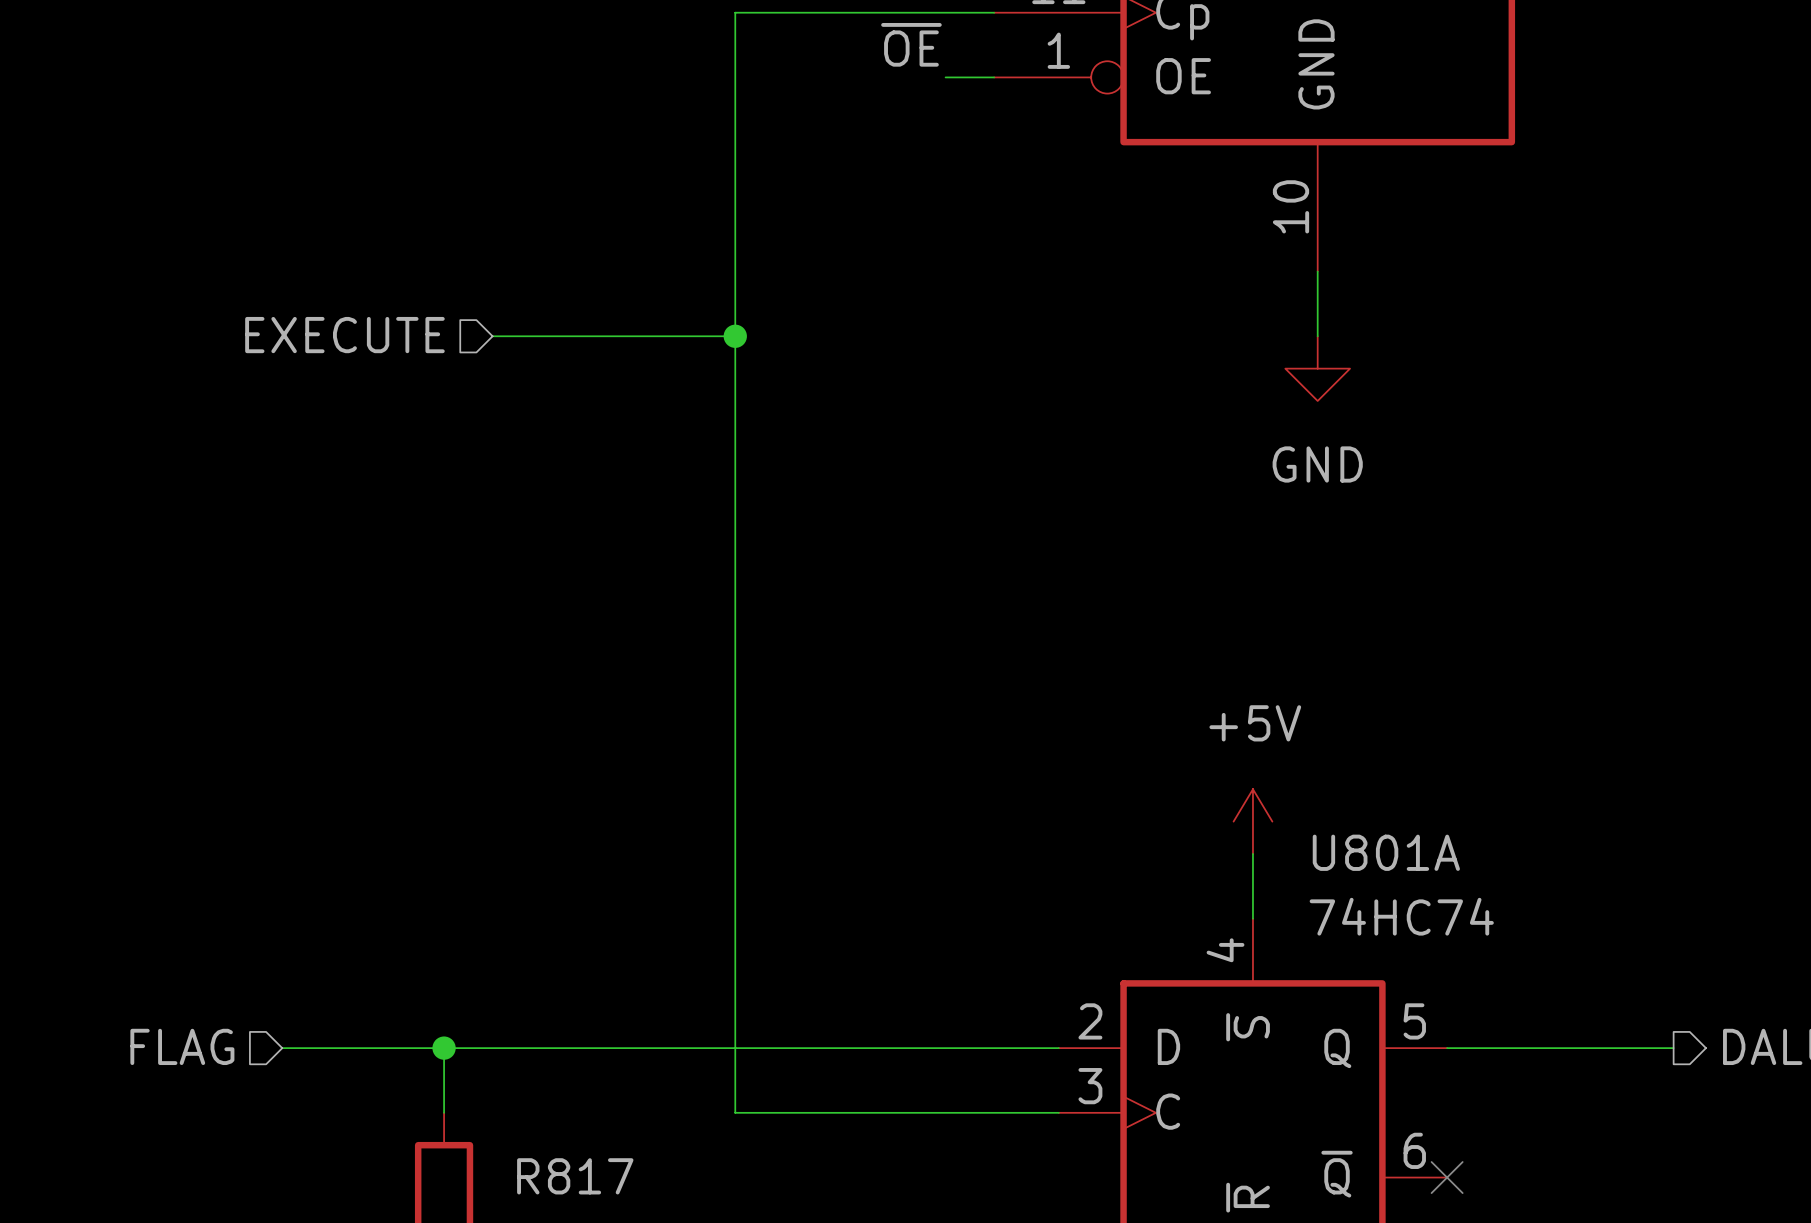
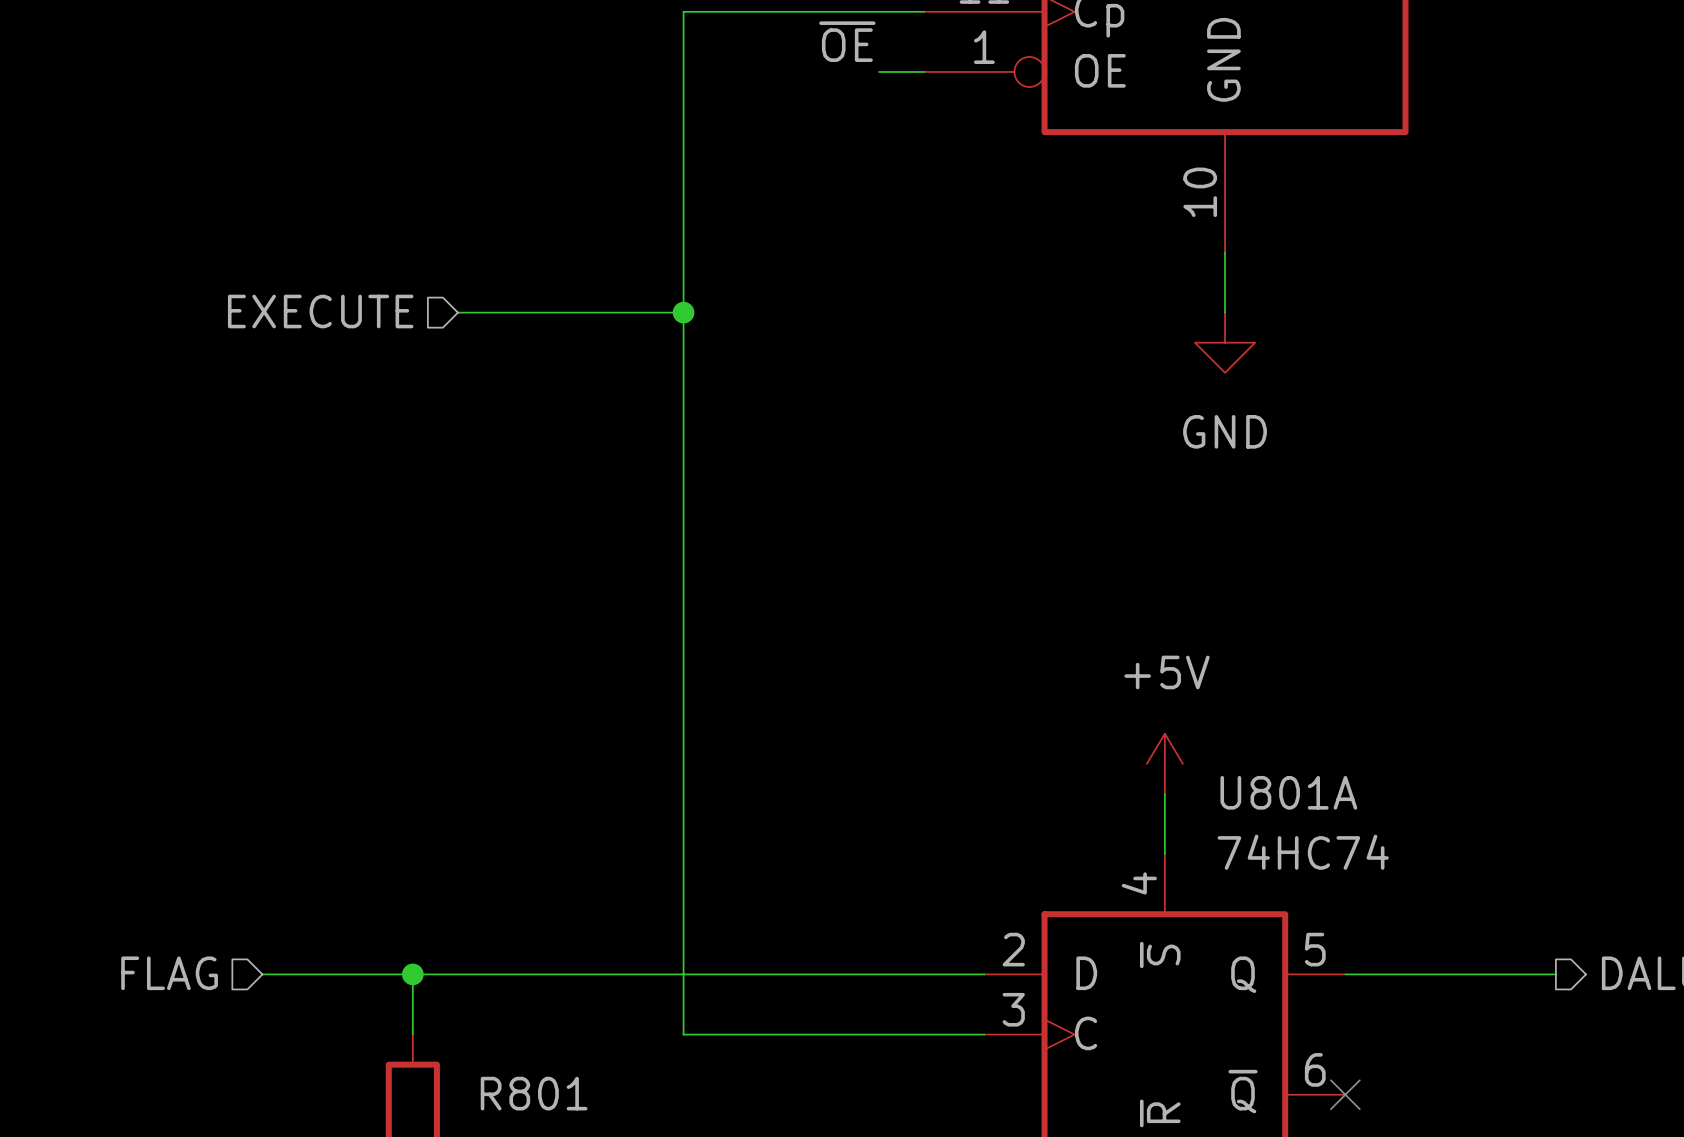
R817 name: R817 (575, 1176) -> R801 (534, 1093)

